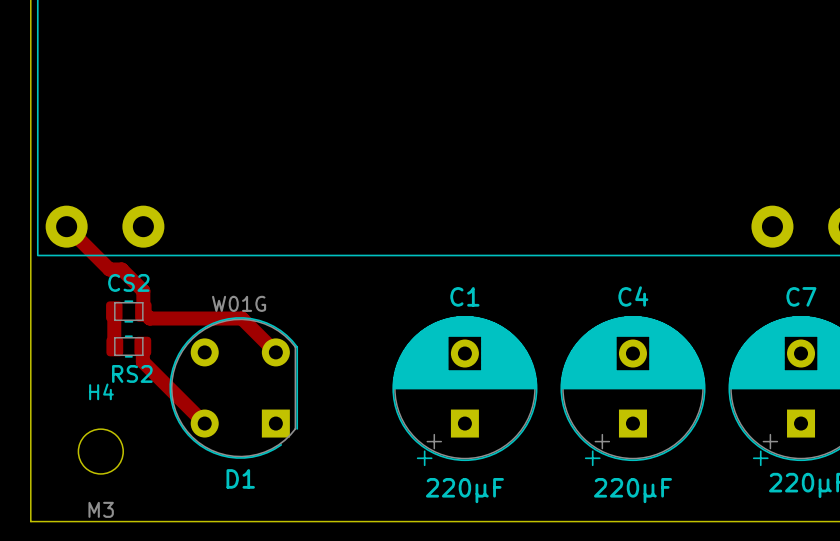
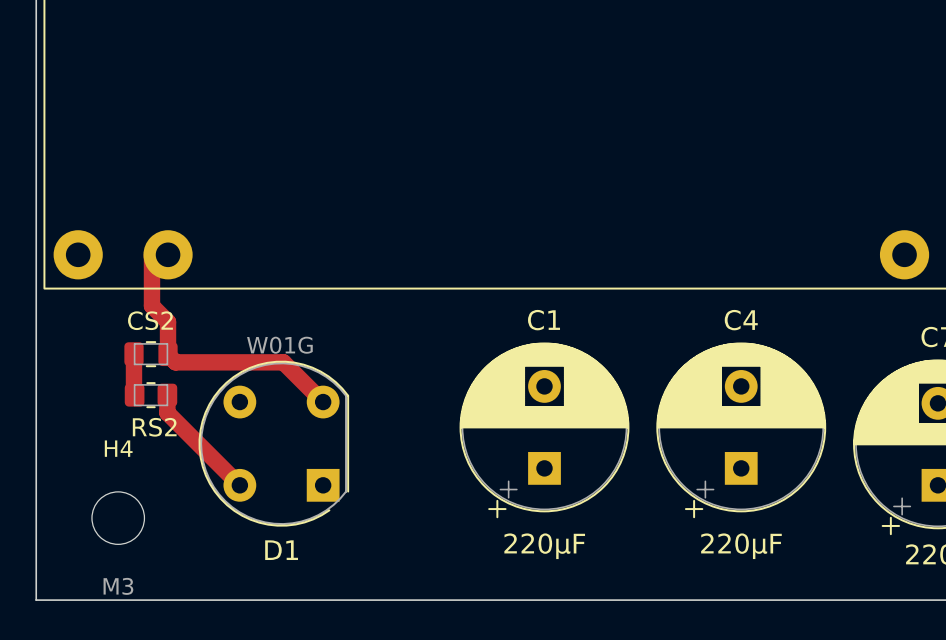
track: (66, 226) (109, 269) (121, 269) (143, 291) -> (151, 254) (151, 305) (168, 321) (168, 330)
C1 position: (464, 391) -> (544, 430)
C4 position: (632, 391) -> (741, 430)

